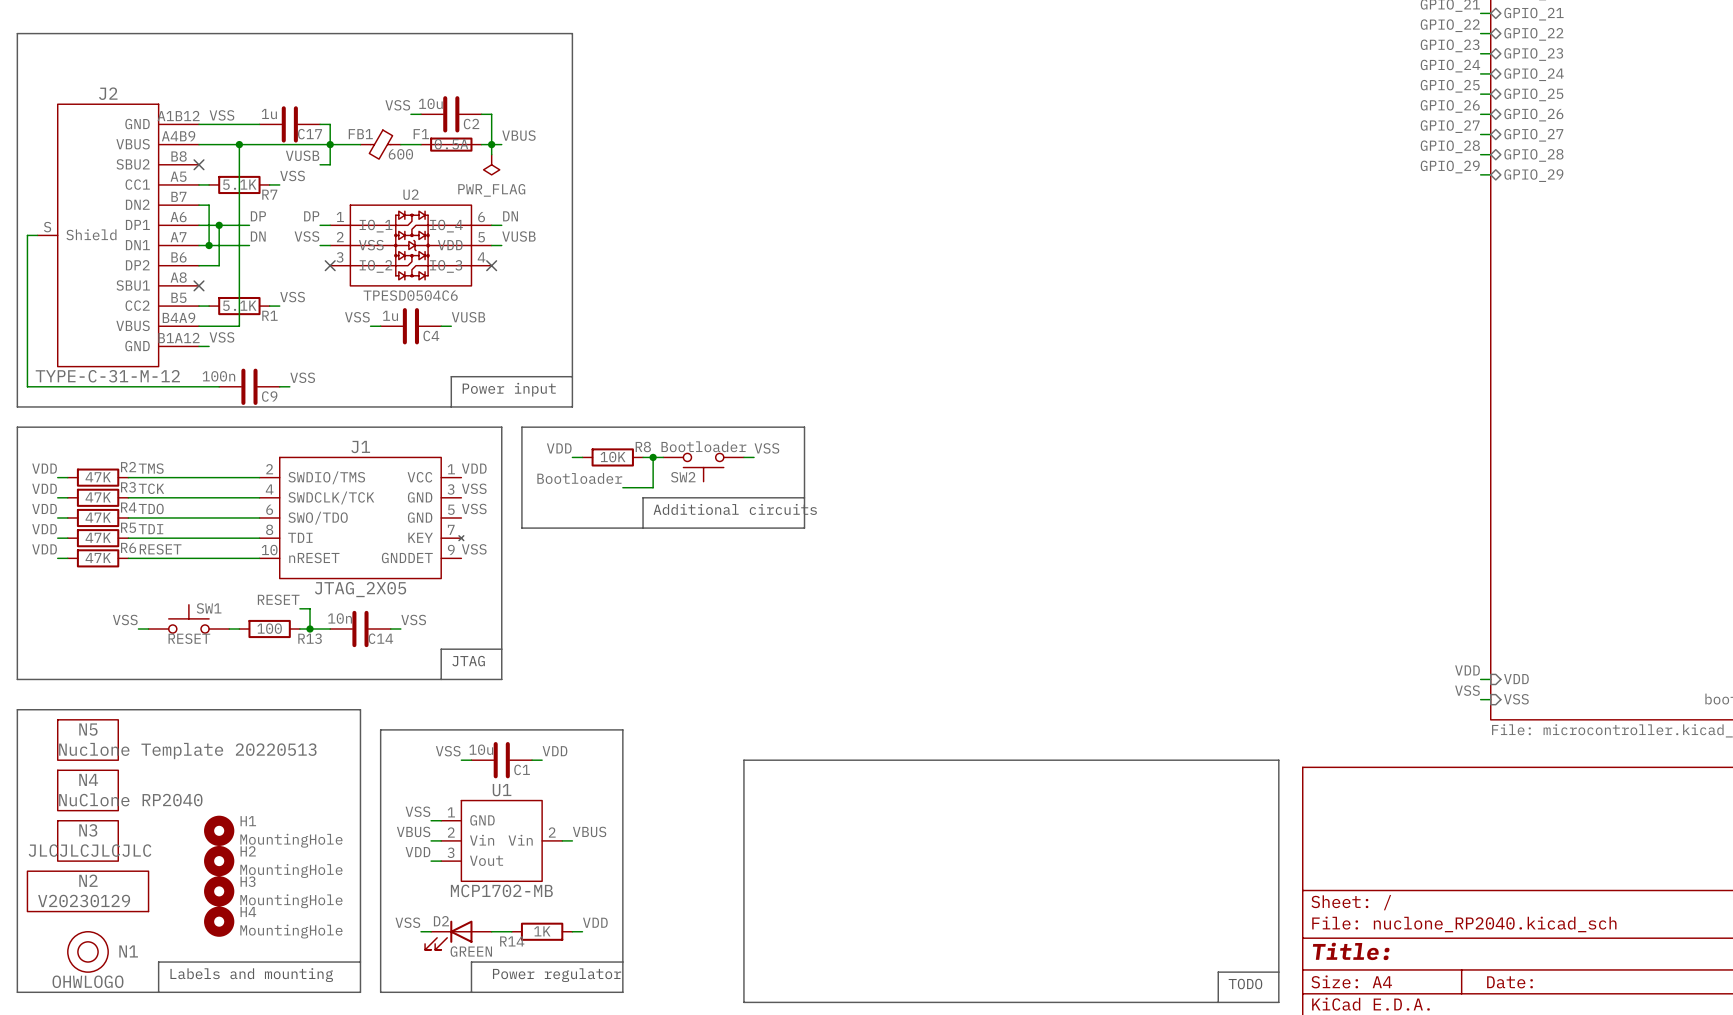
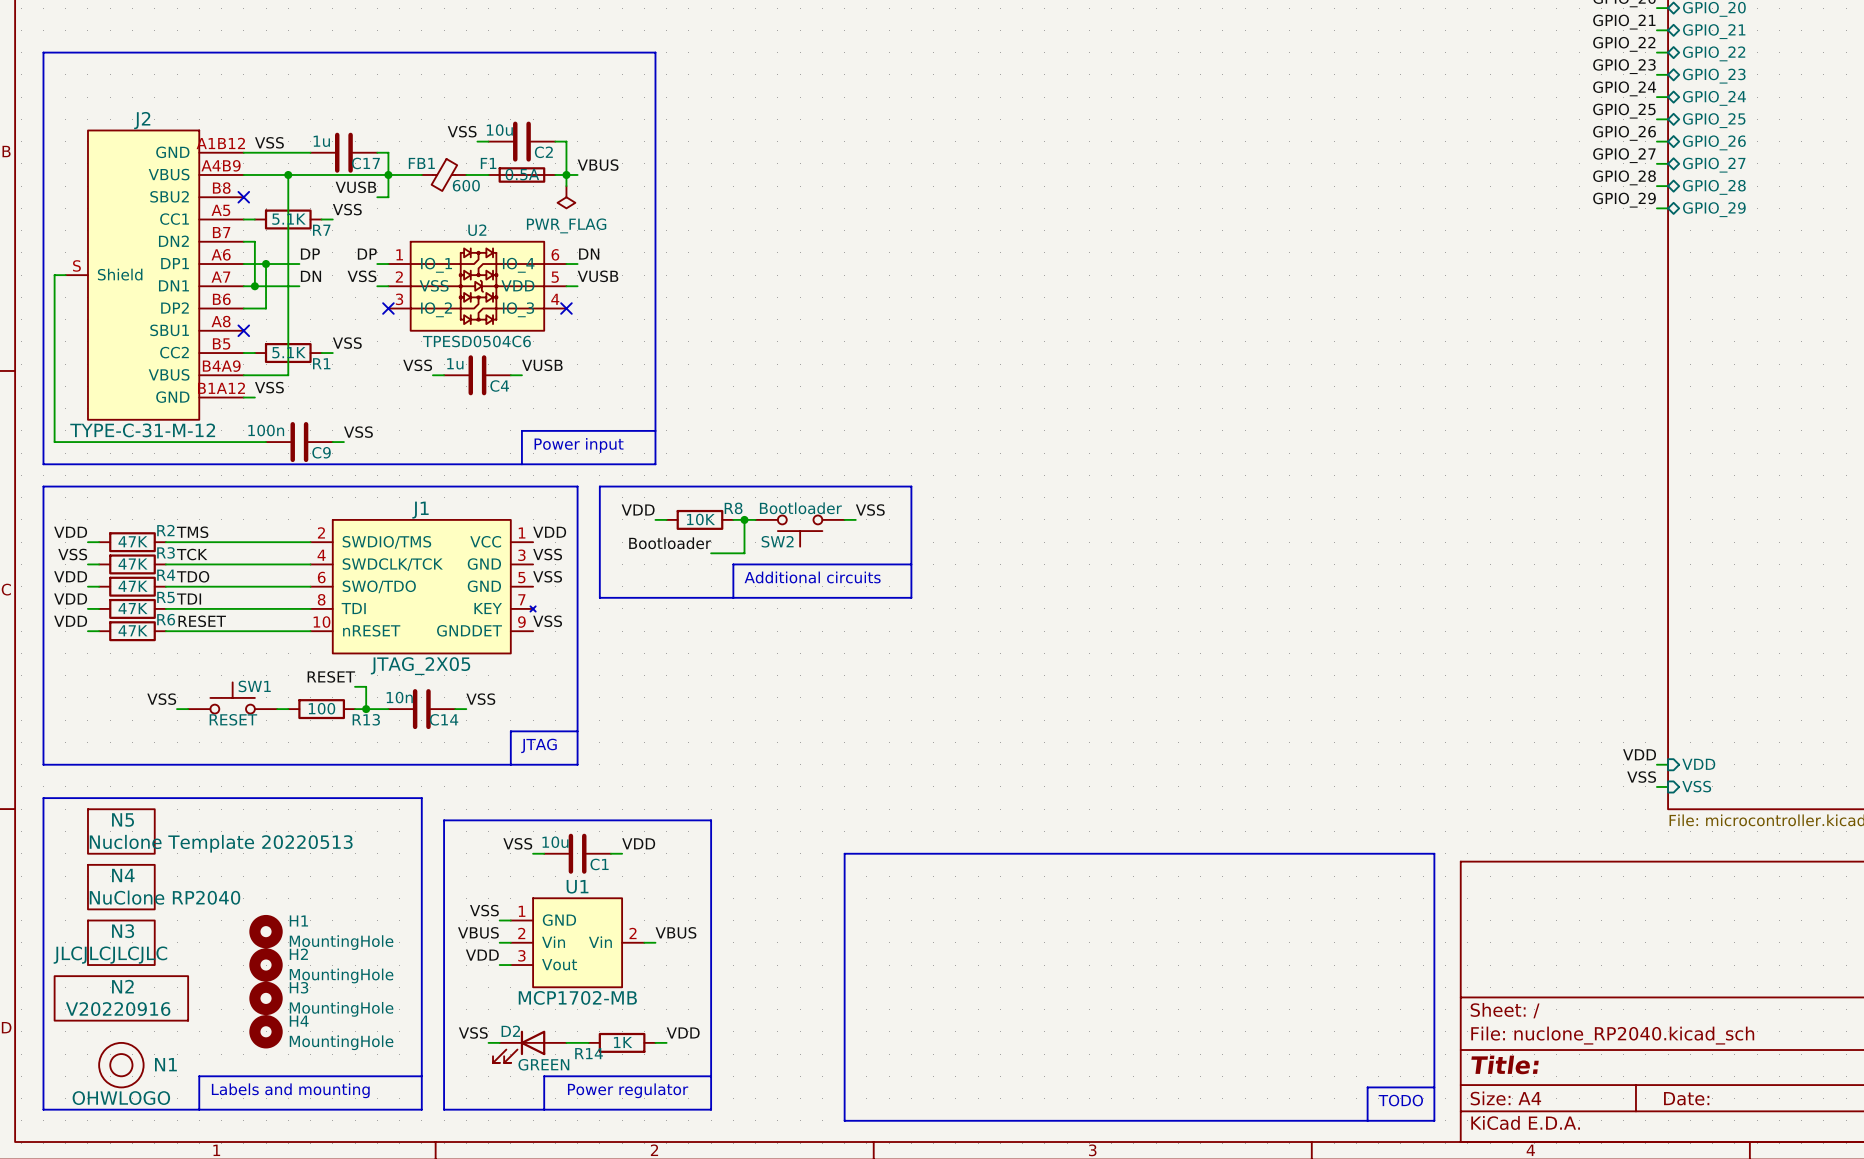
label: VDD (44, 488) -> VSS (72, 554)
N2 value: V20230129 (84, 901) -> V20220916 (118, 1009)

